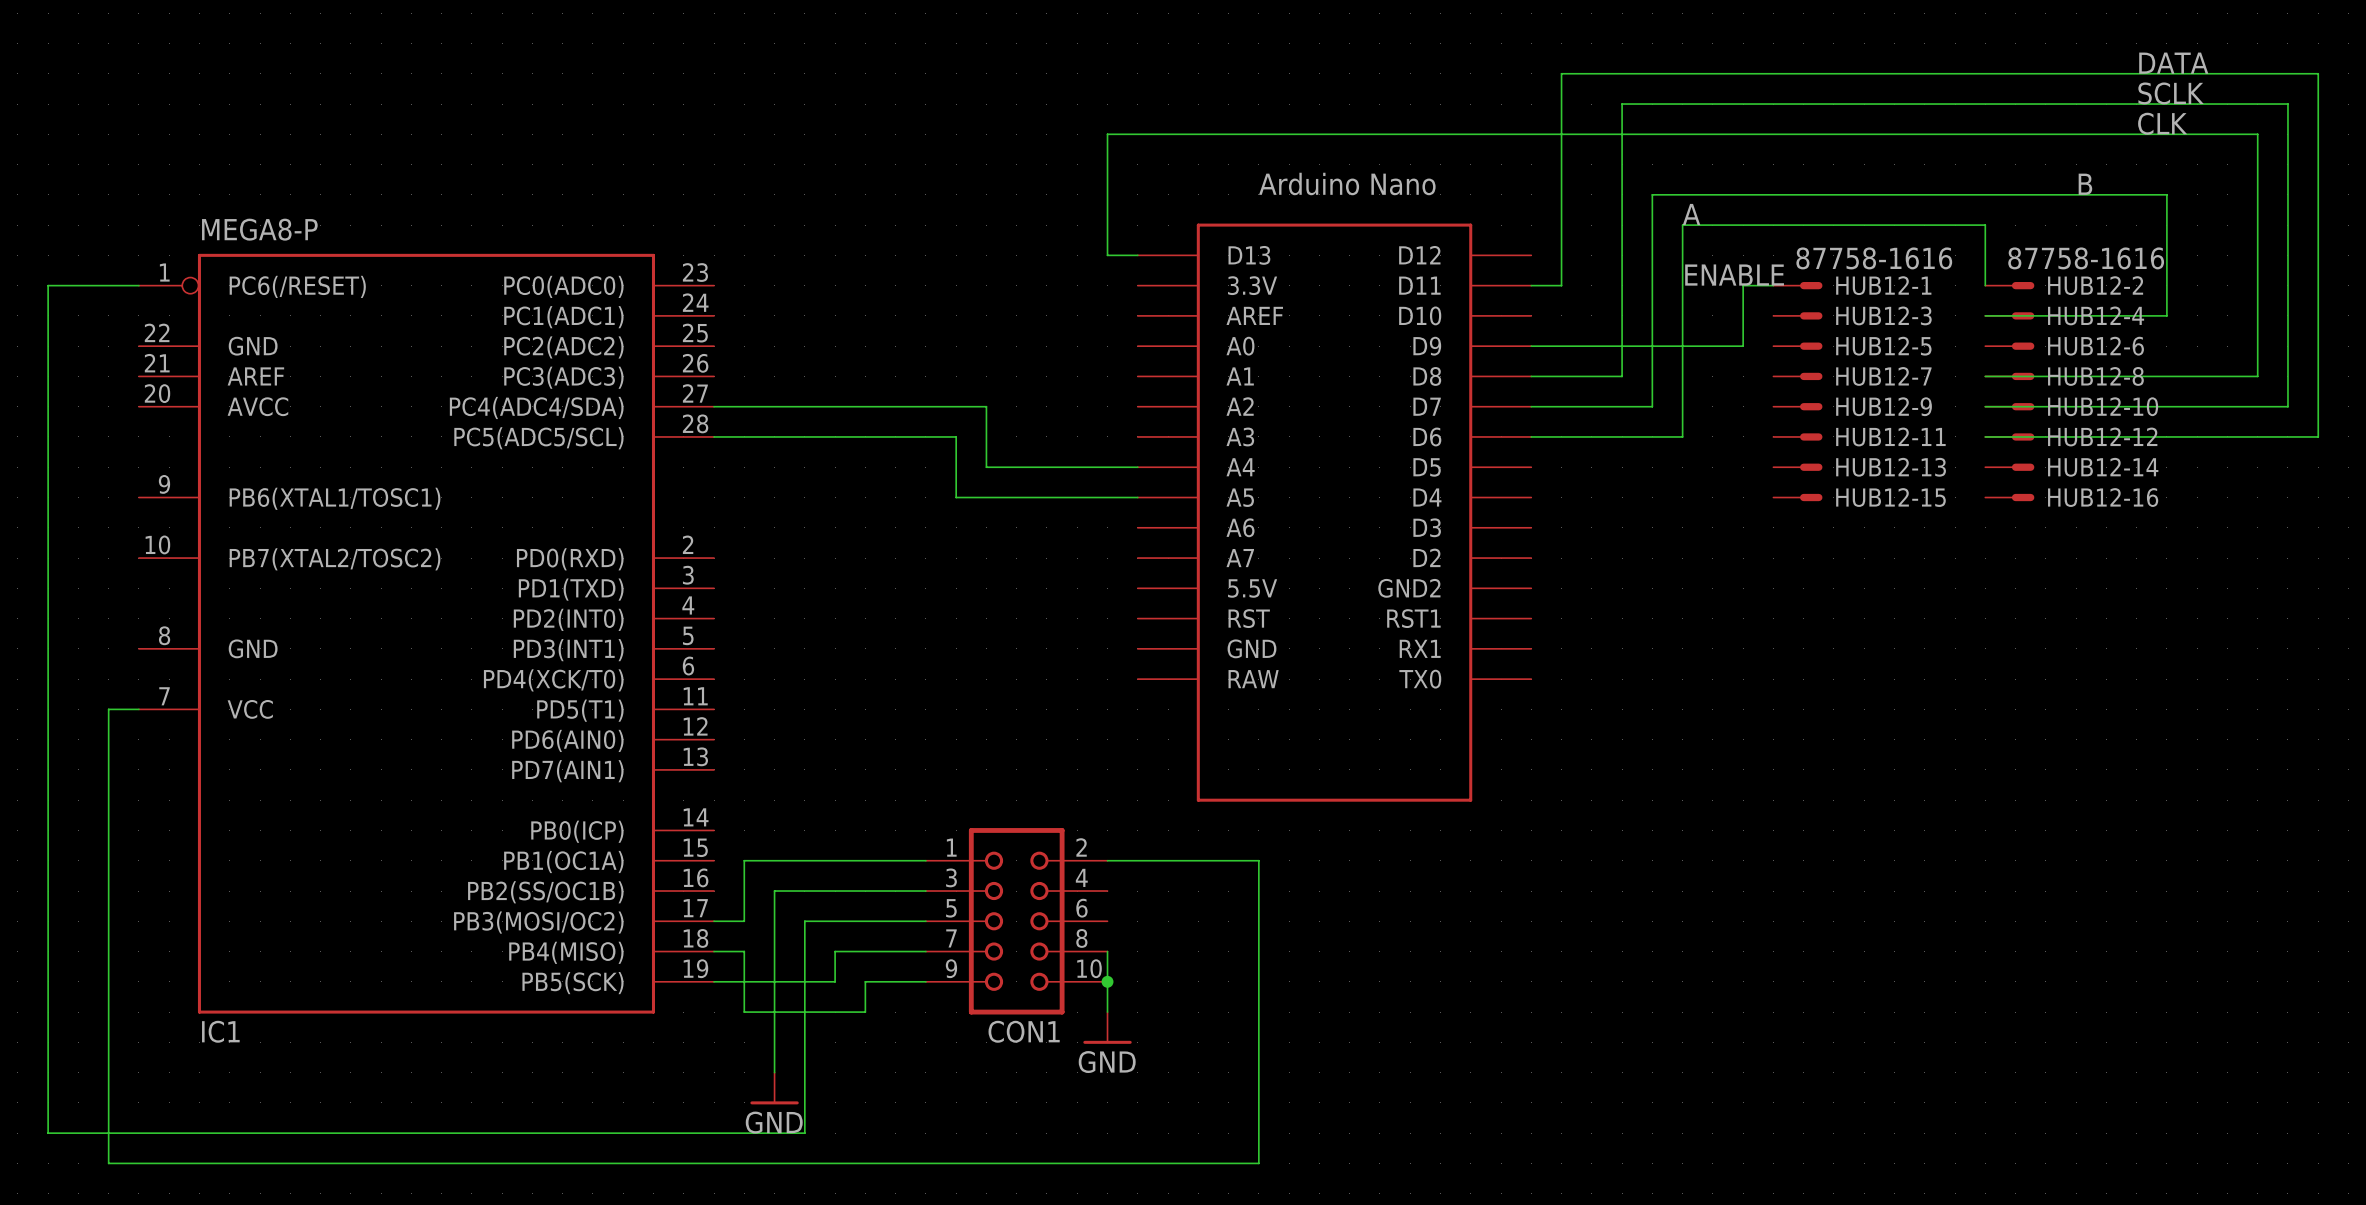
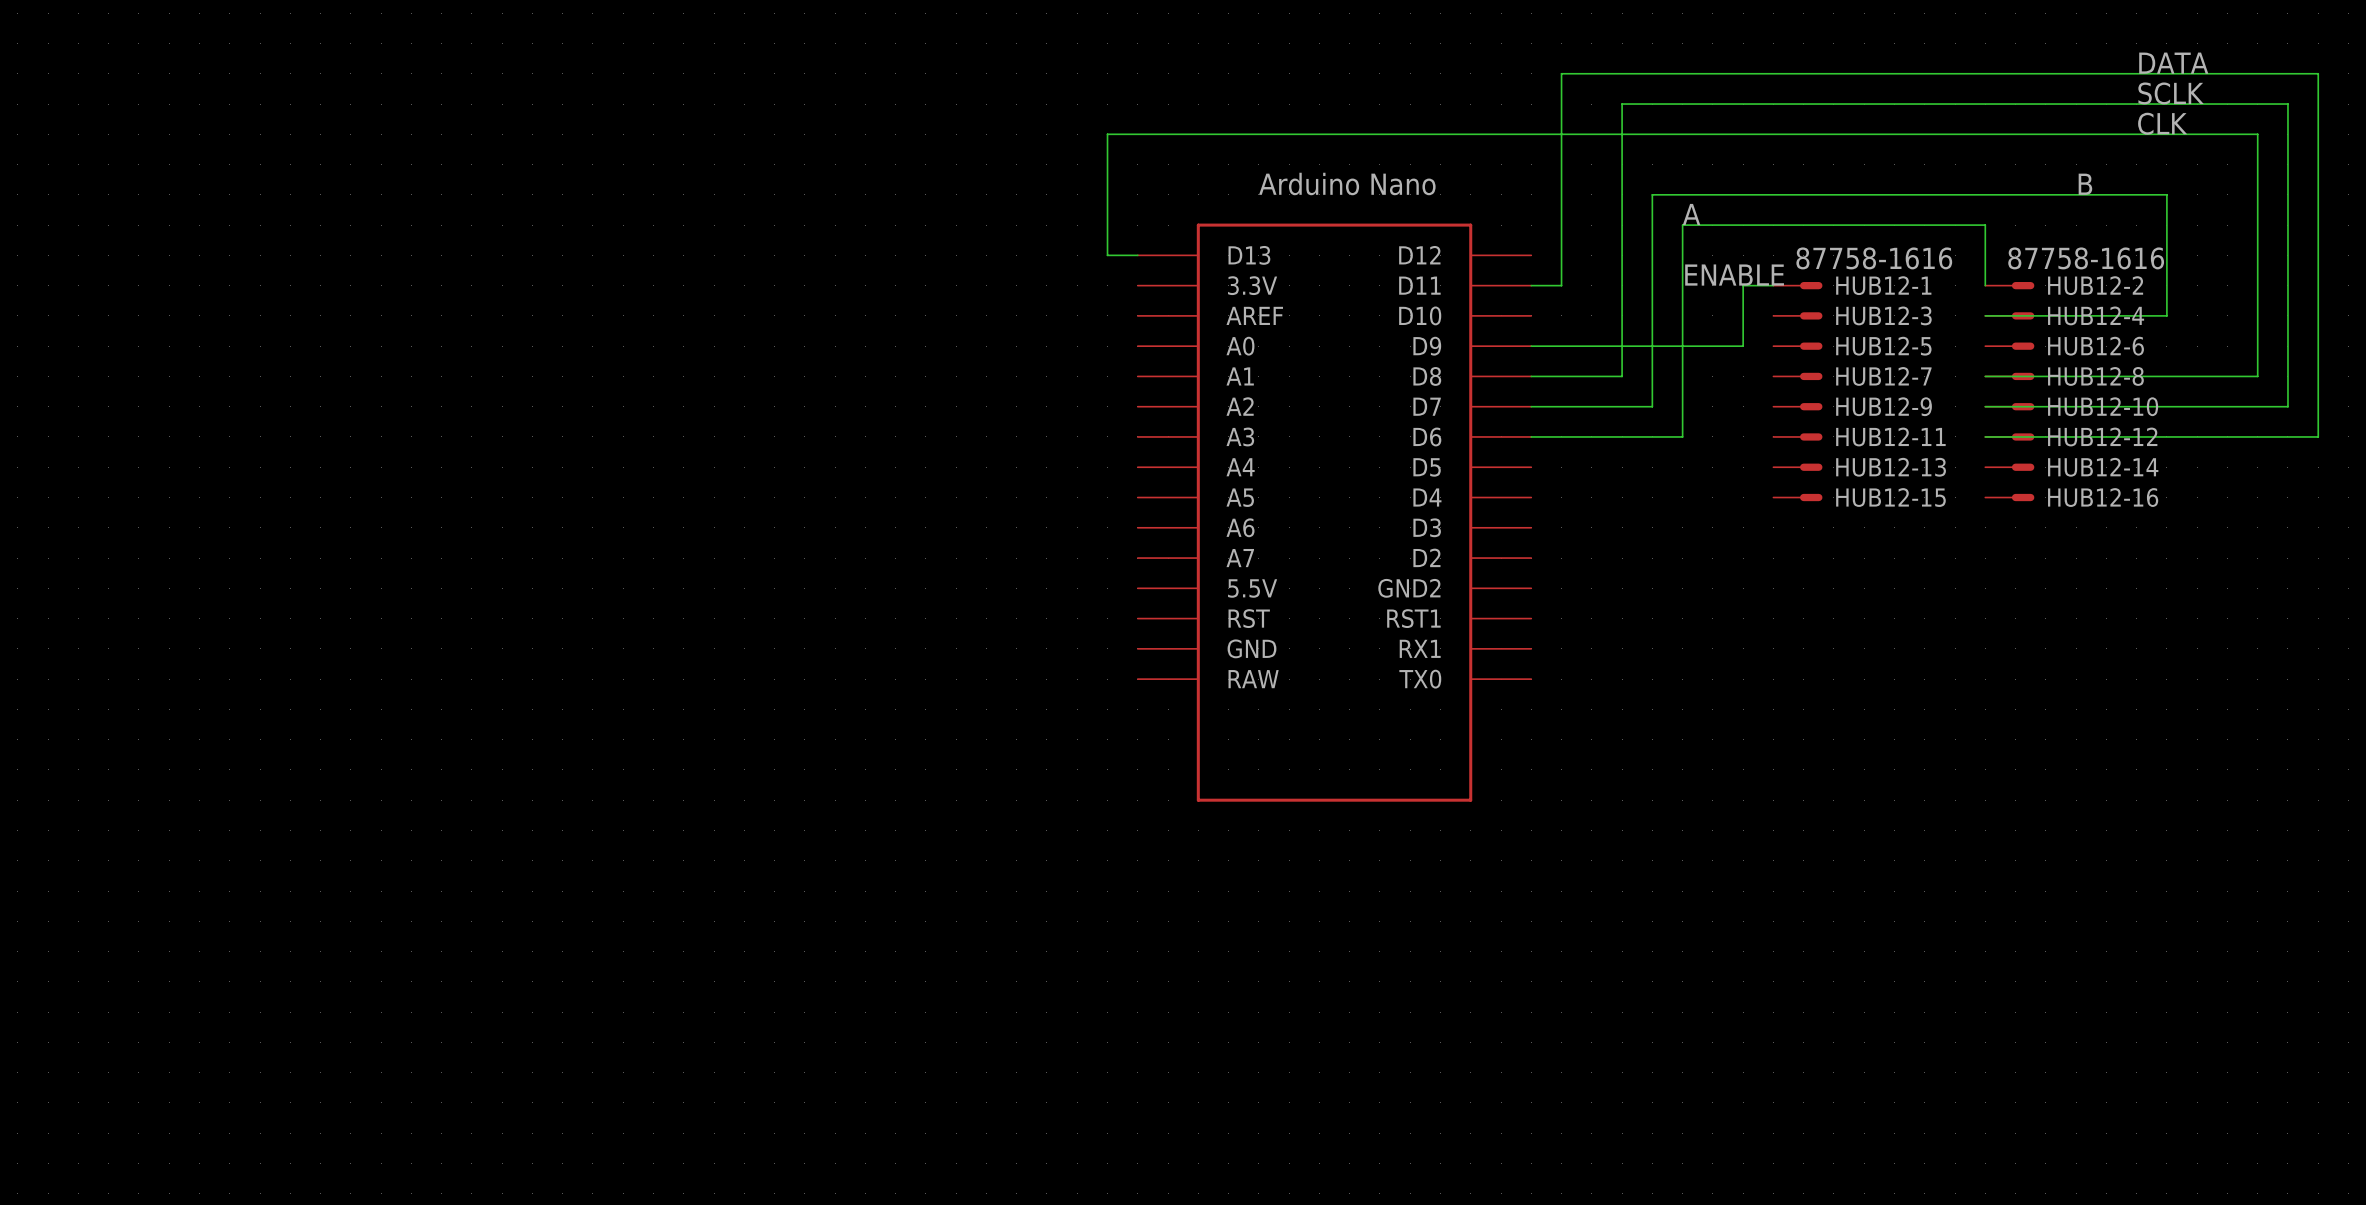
wire: (138, 285) (48, 285) (48, 1133) (804, 1133) (804, 921) (925, 921) -> none
wire: (714, 406) (986, 406) (986, 467) (1137, 467) -> none
wire: (714, 436) (956, 436) (956, 497) (1137, 497) -> none
IC1: MEGA8-P (426, 633) -> none
wire: (138, 709) (108, 709) (108, 1163) (1258, 1163) (1258, 860) (1107, 860) -> none
wire: (925, 860) (744, 860) (744, 921) (714, 921) -> none
wire: (925, 891) (774, 891) (774, 1072) -> none
CON1: (1016, 921) -> none
wire: (714, 951) (744, 951) (744, 1012) (865, 1012) (865, 981) (925, 981) -> none
wire: (925, 951) (835, 951) (835, 981) (714, 981) -> none
wire: (1107, 951) (1107, 1012) -> none
junction: (1107, 981) -> none
power symbol: GND (1107, 1027) -> none
power symbol: GND (774, 1088) -> none

